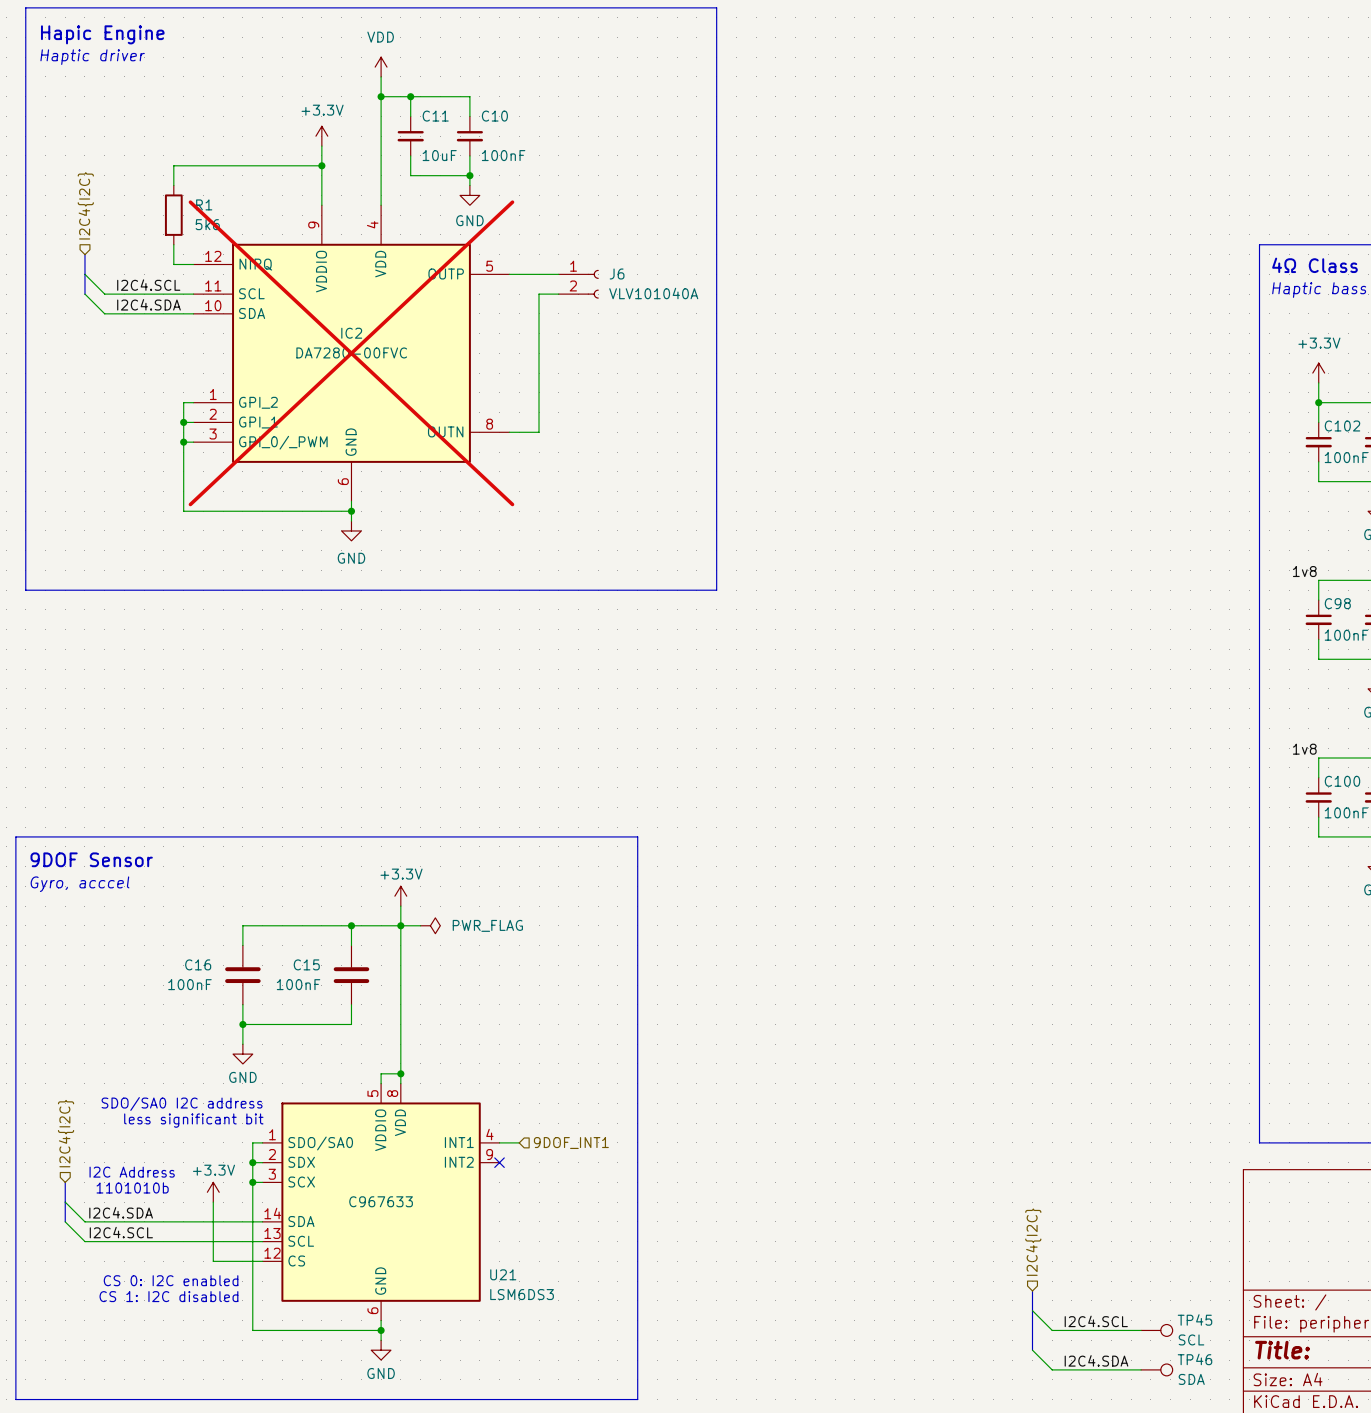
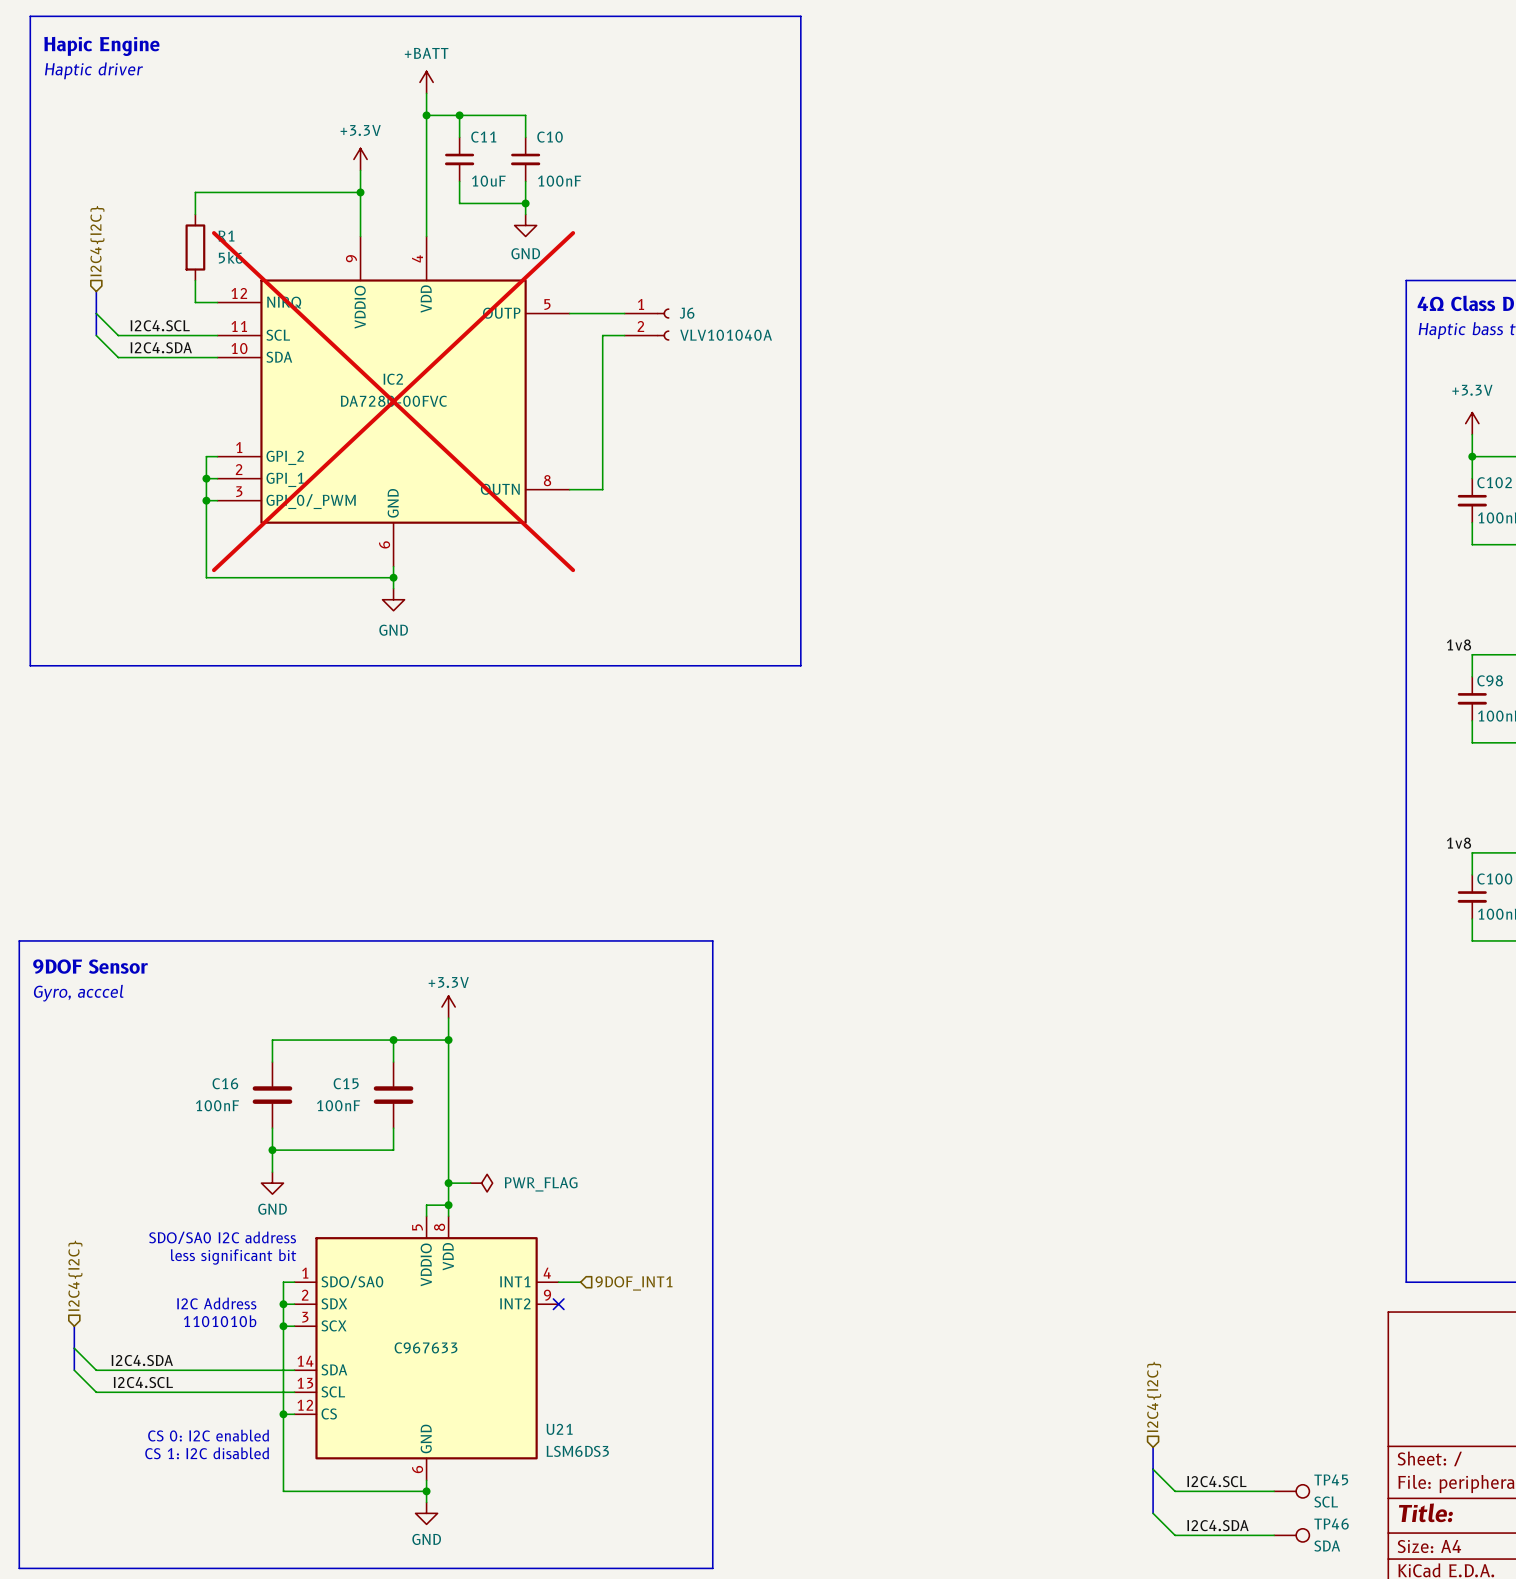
power symbol: VDD (381, 67) -> +BATT (426, 82)
wire: (400, 925) (420, 925) -> (448, 1183) (470, 1183)
power symbol position: PWR_FLAG (430, 925) -> PWR_FLAG (481, 1183)
junction: none -> (448, 1183)
text position: I2C Address (132, 1172) -> I2C Address (216, 1303)
text position: 1101010b (132, 1188) -> 1101010b (220, 1321)
power symbol: +3.3V (213, 1192) -> none
wire: (213, 1202) (213, 1261) (252, 1261) -> none
junction: none -> (283, 1414)

